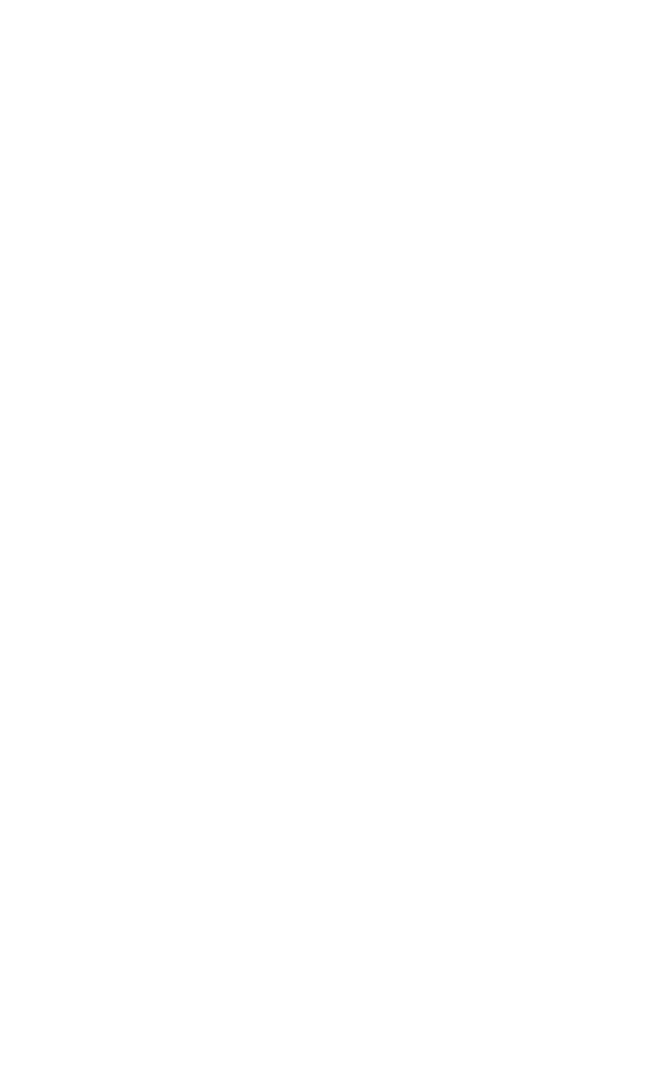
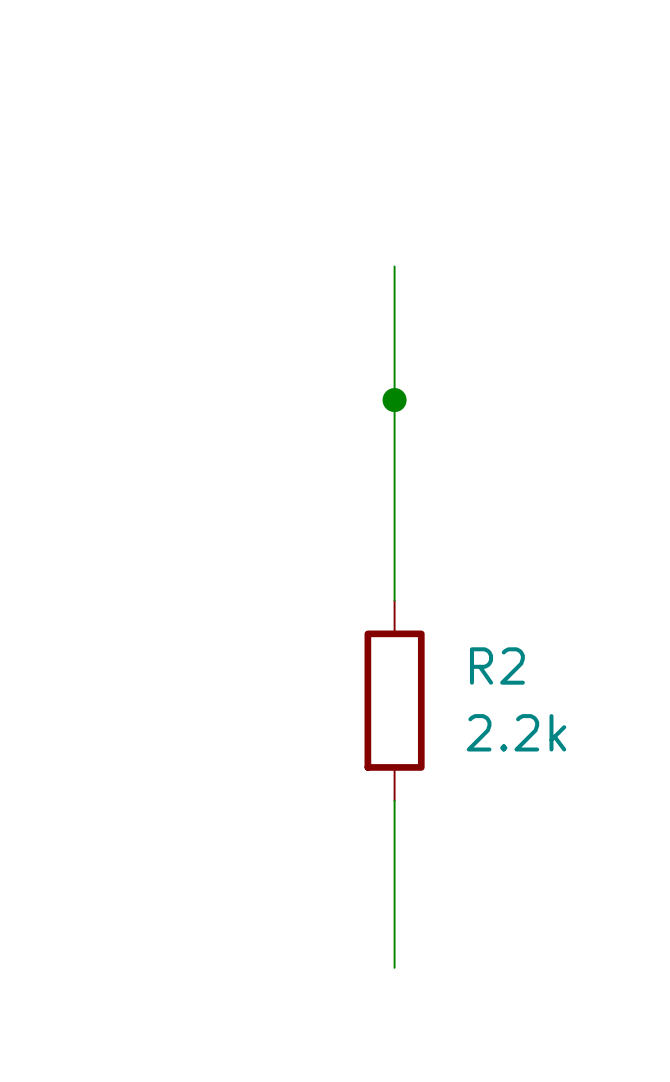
wire: none -> (394, 266) (394, 600)
junction: none -> (394, 400)
R2: none -> 2.2k (394, 700)
wire: none -> (394, 800) (394, 967)

